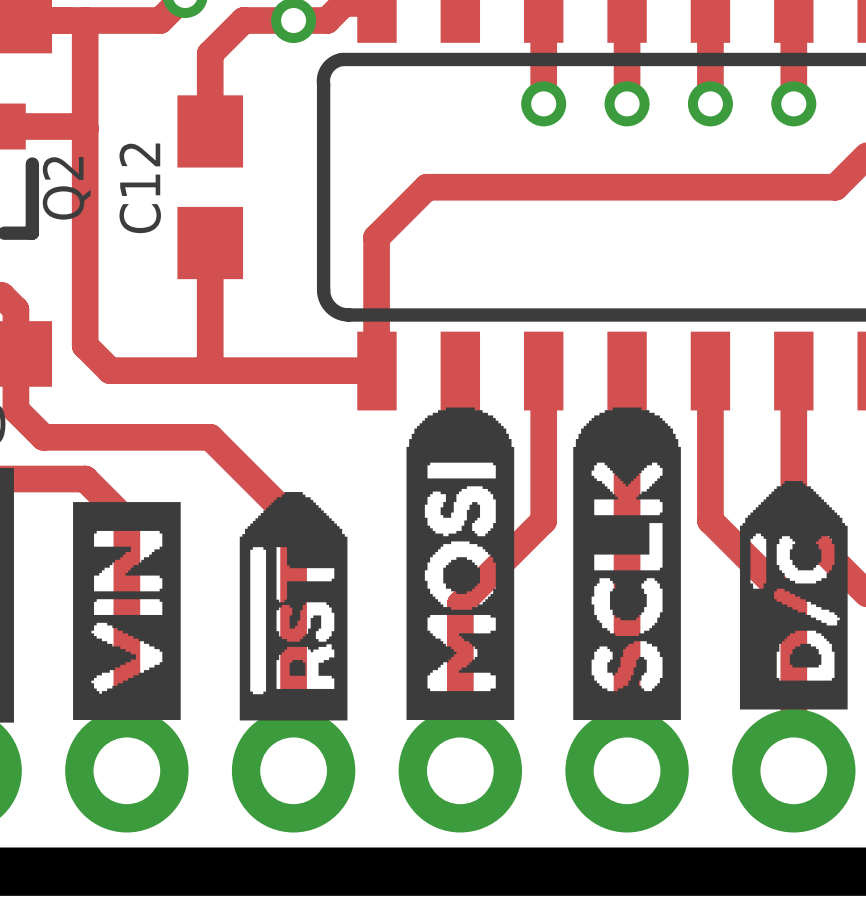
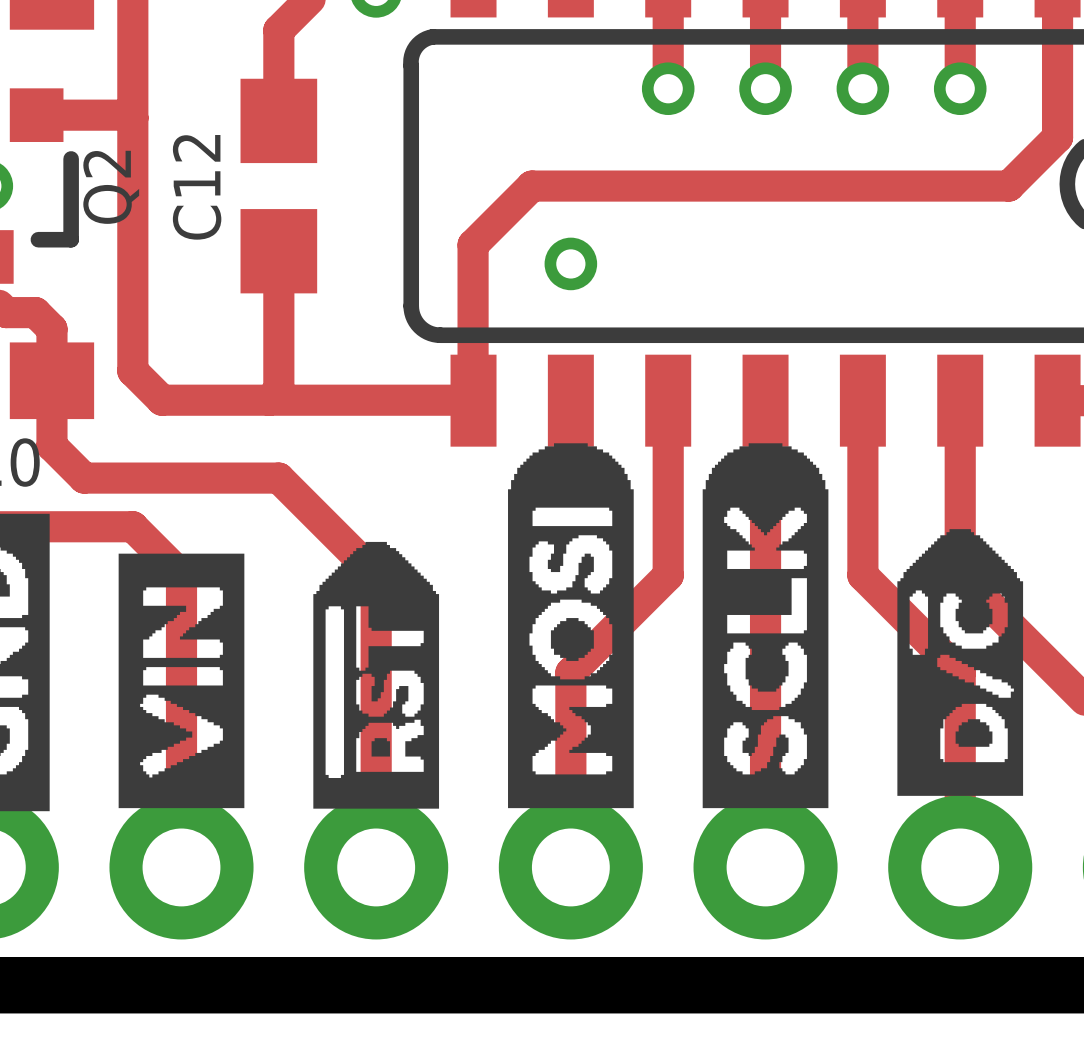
via: none -> (570, 263)

